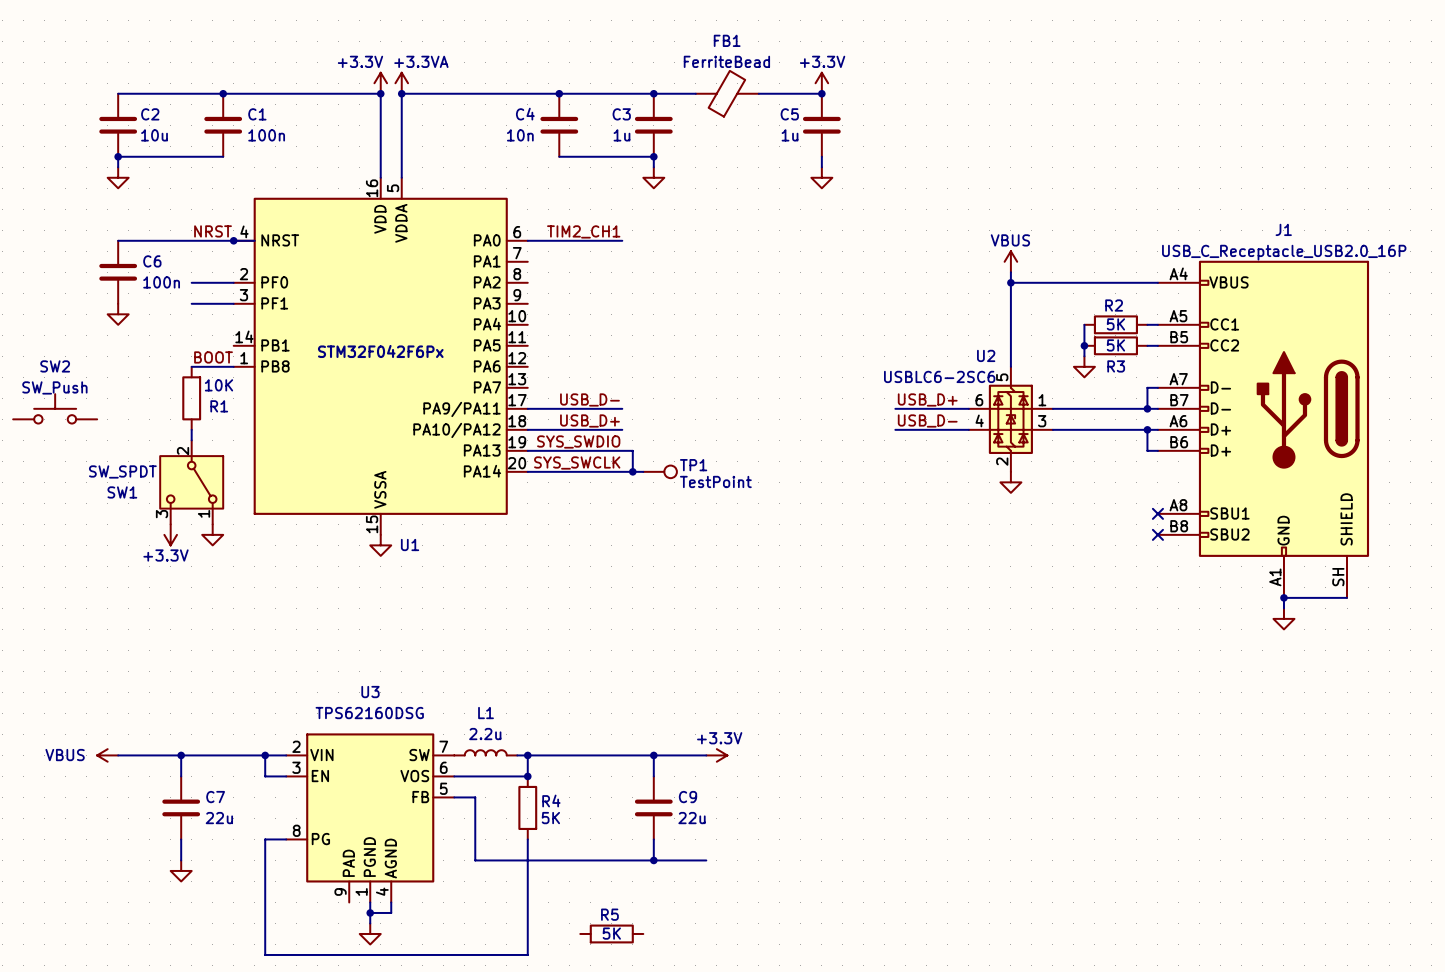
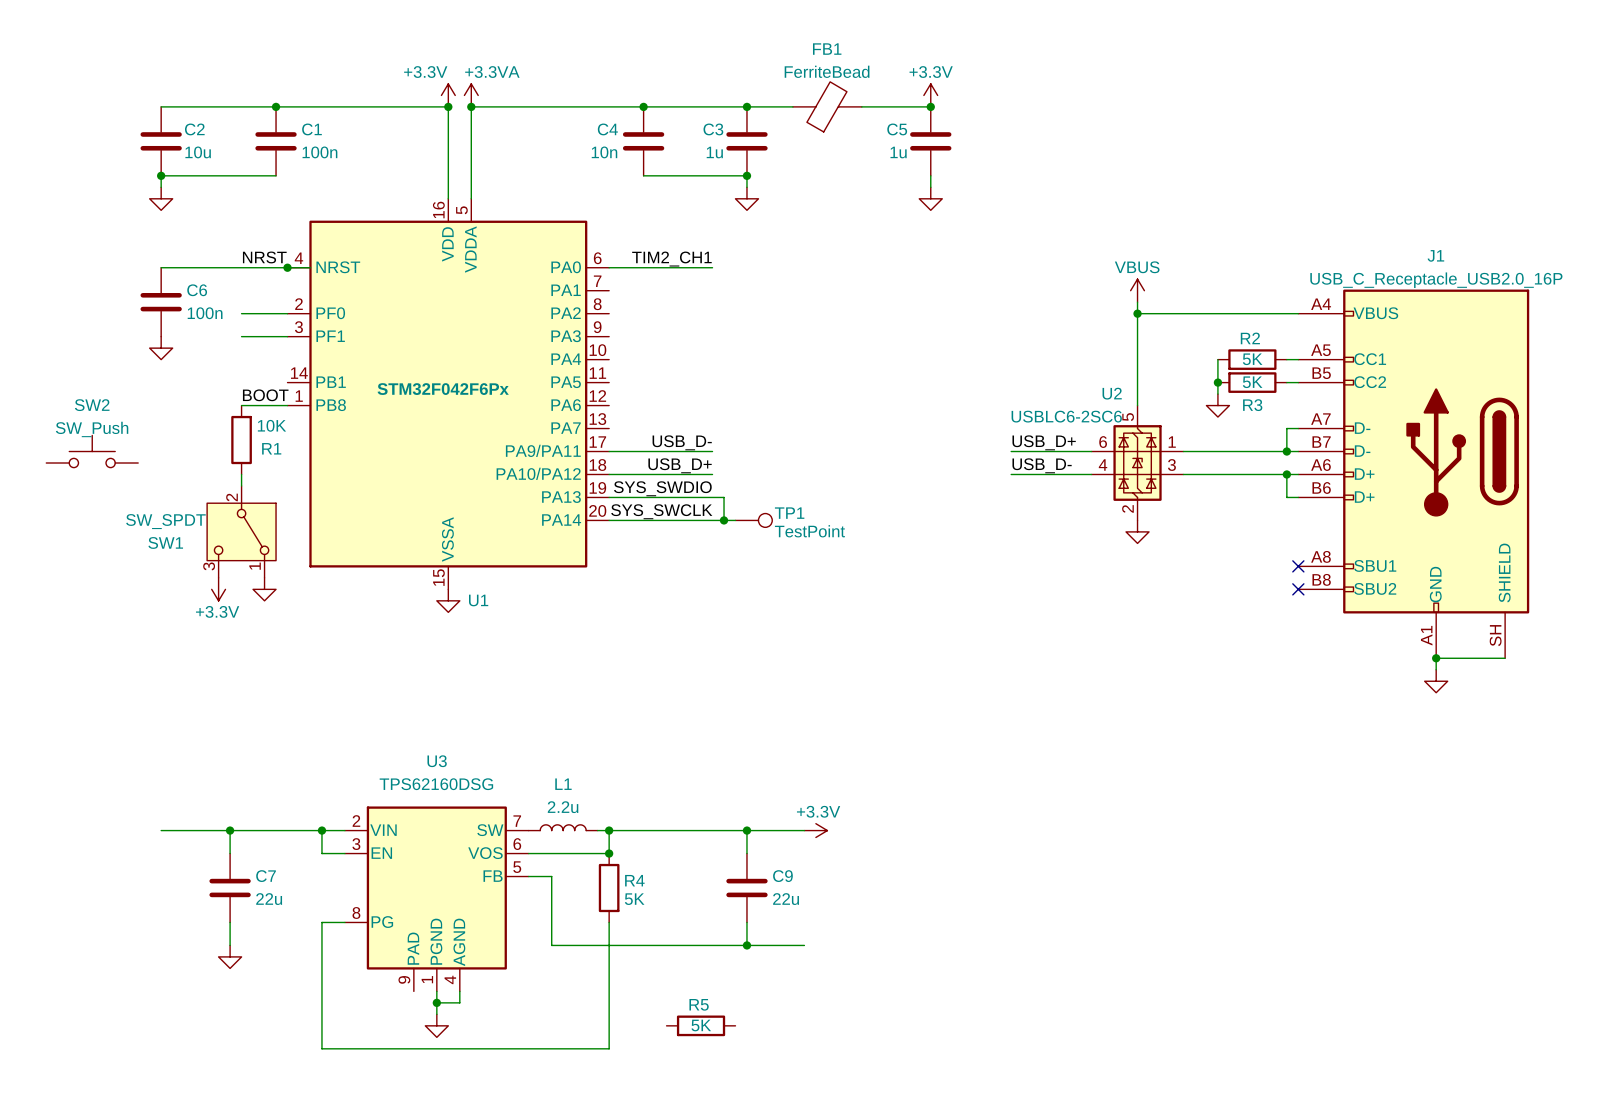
power symbol: VBUS (107, 755) -> none

